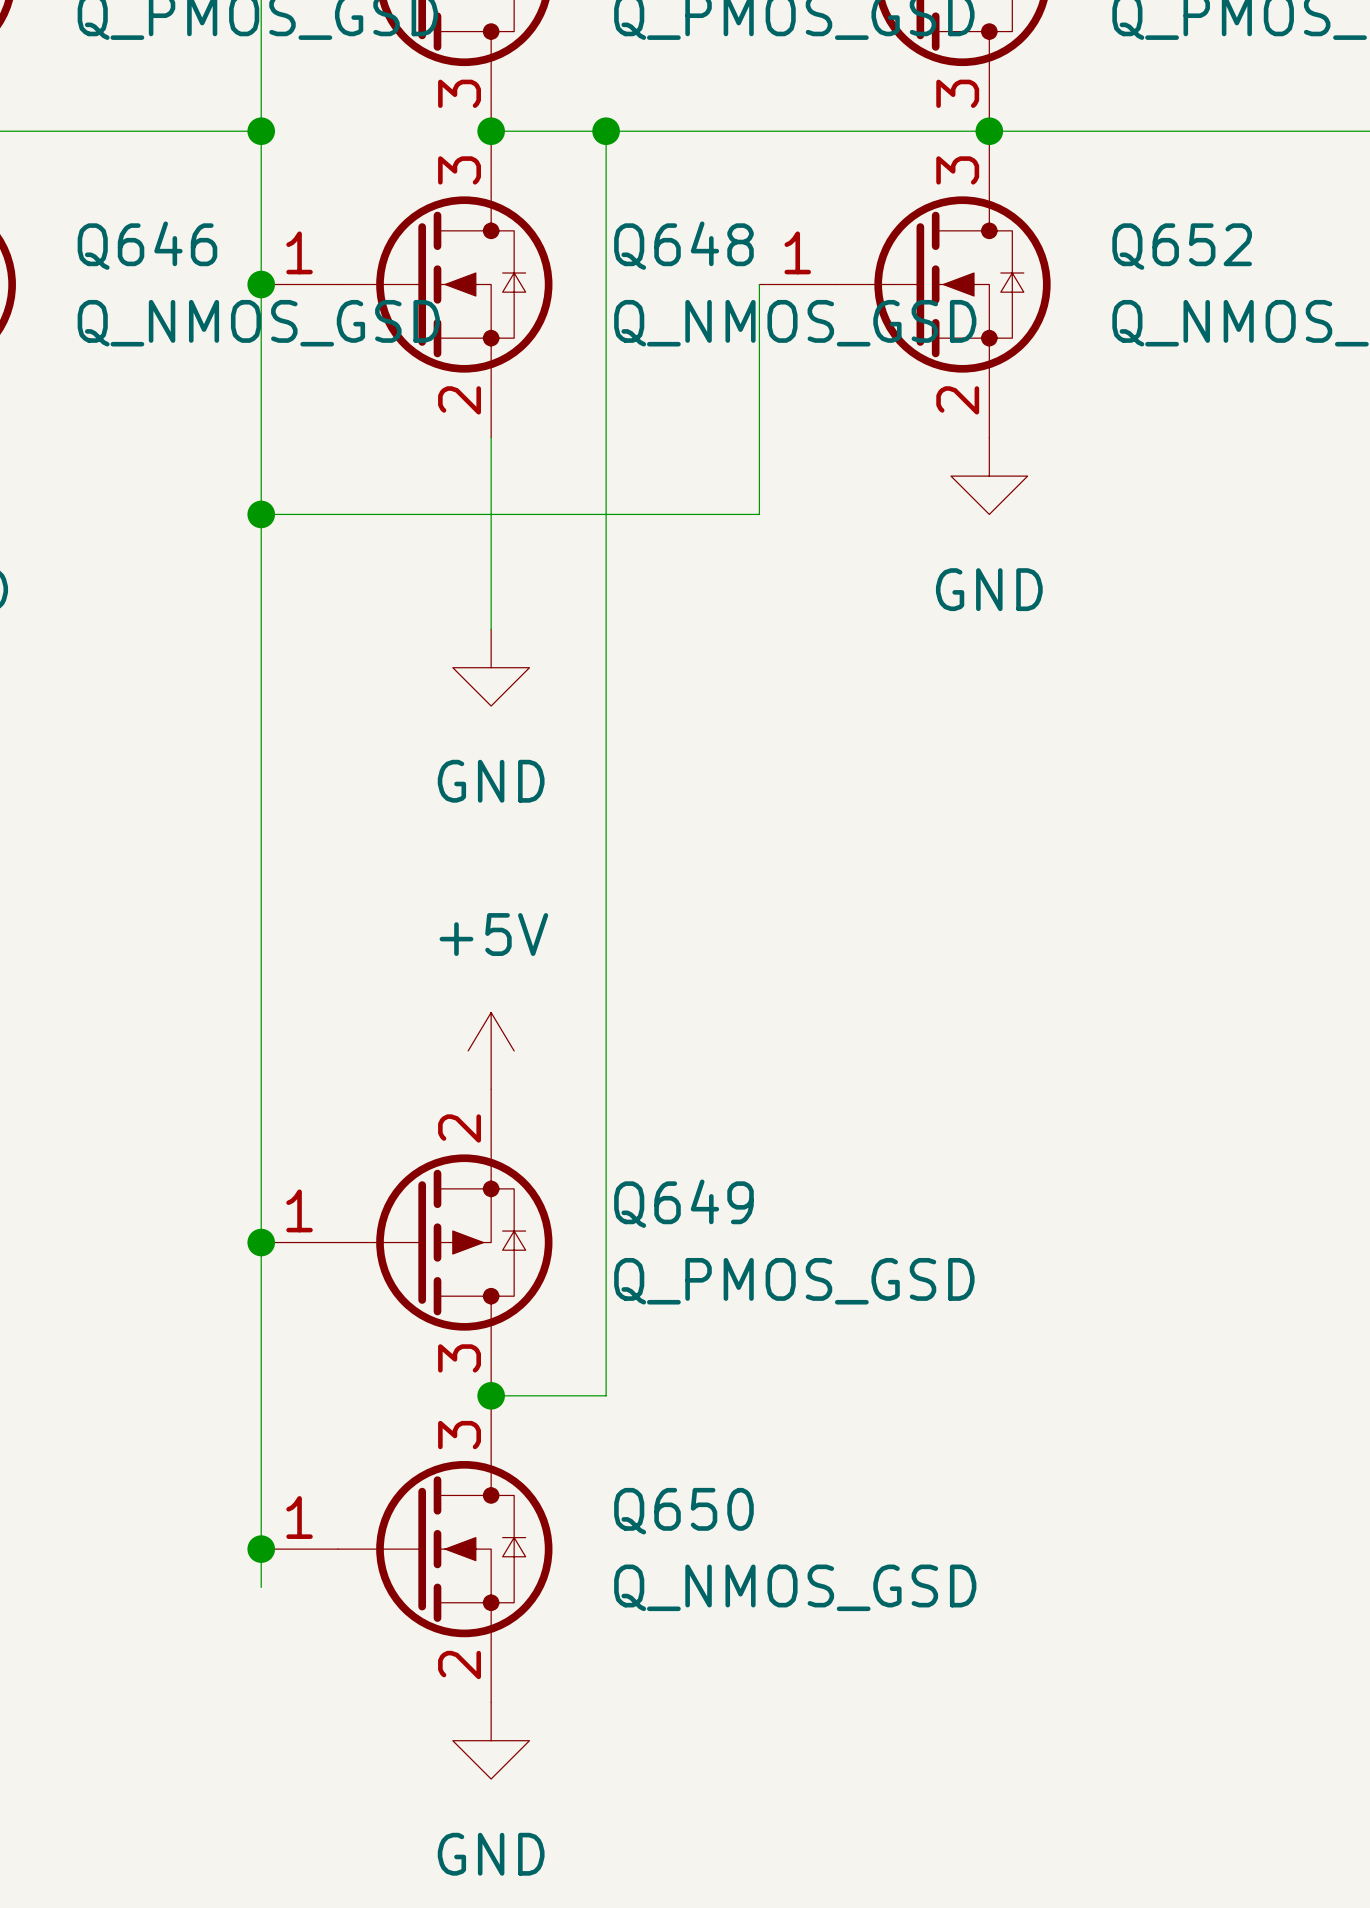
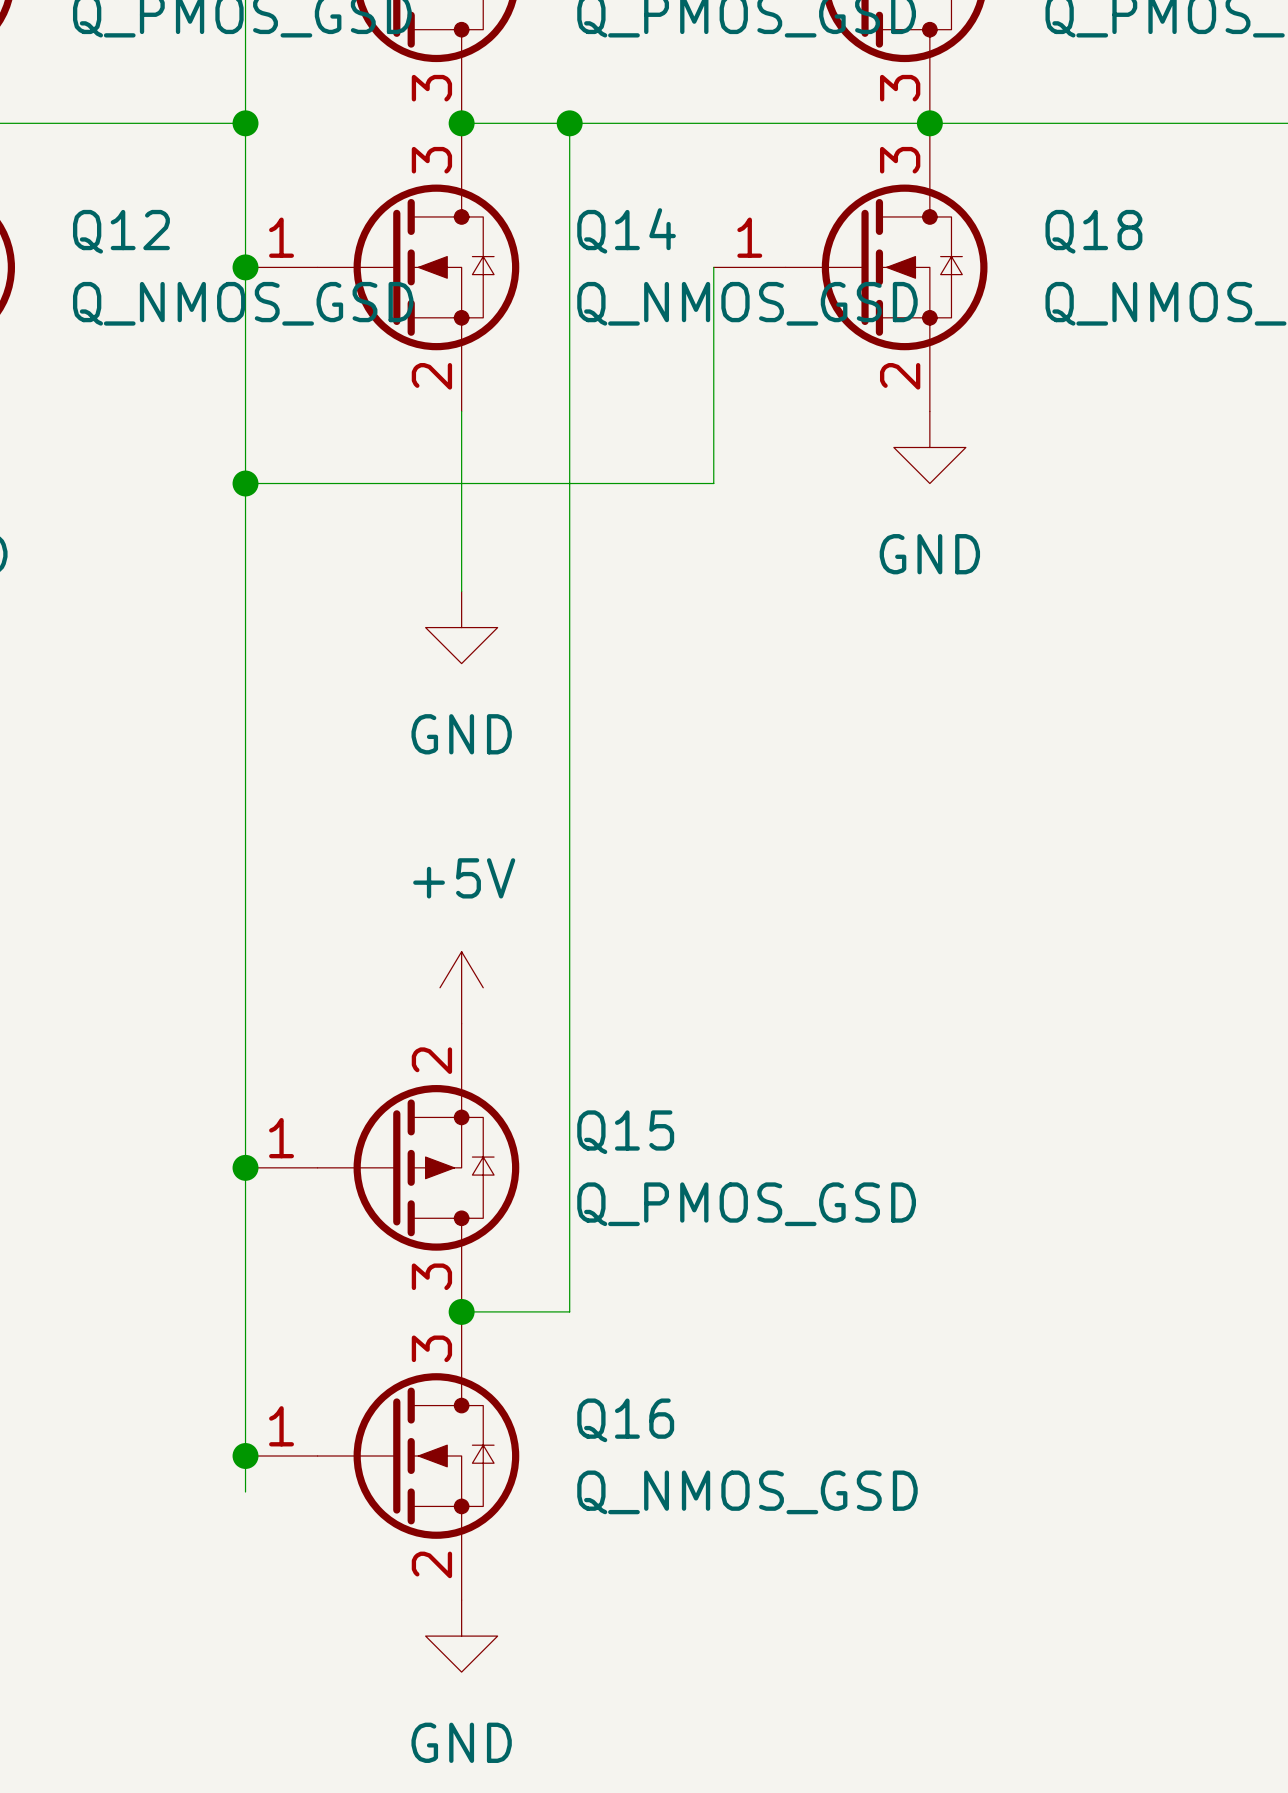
Q646 name: Q646 (147, 245) -> Q12 (121, 231)
Q648 name: Q648 (683, 245) -> Q14 (626, 230)
Q652 name: Q652 (1182, 246) -> Q18 (1093, 231)
Q649 name: Q649 (683, 1203) -> Q15 (625, 1132)
Q650 name: Q650 (683, 1511) -> Q16 (625, 1420)

